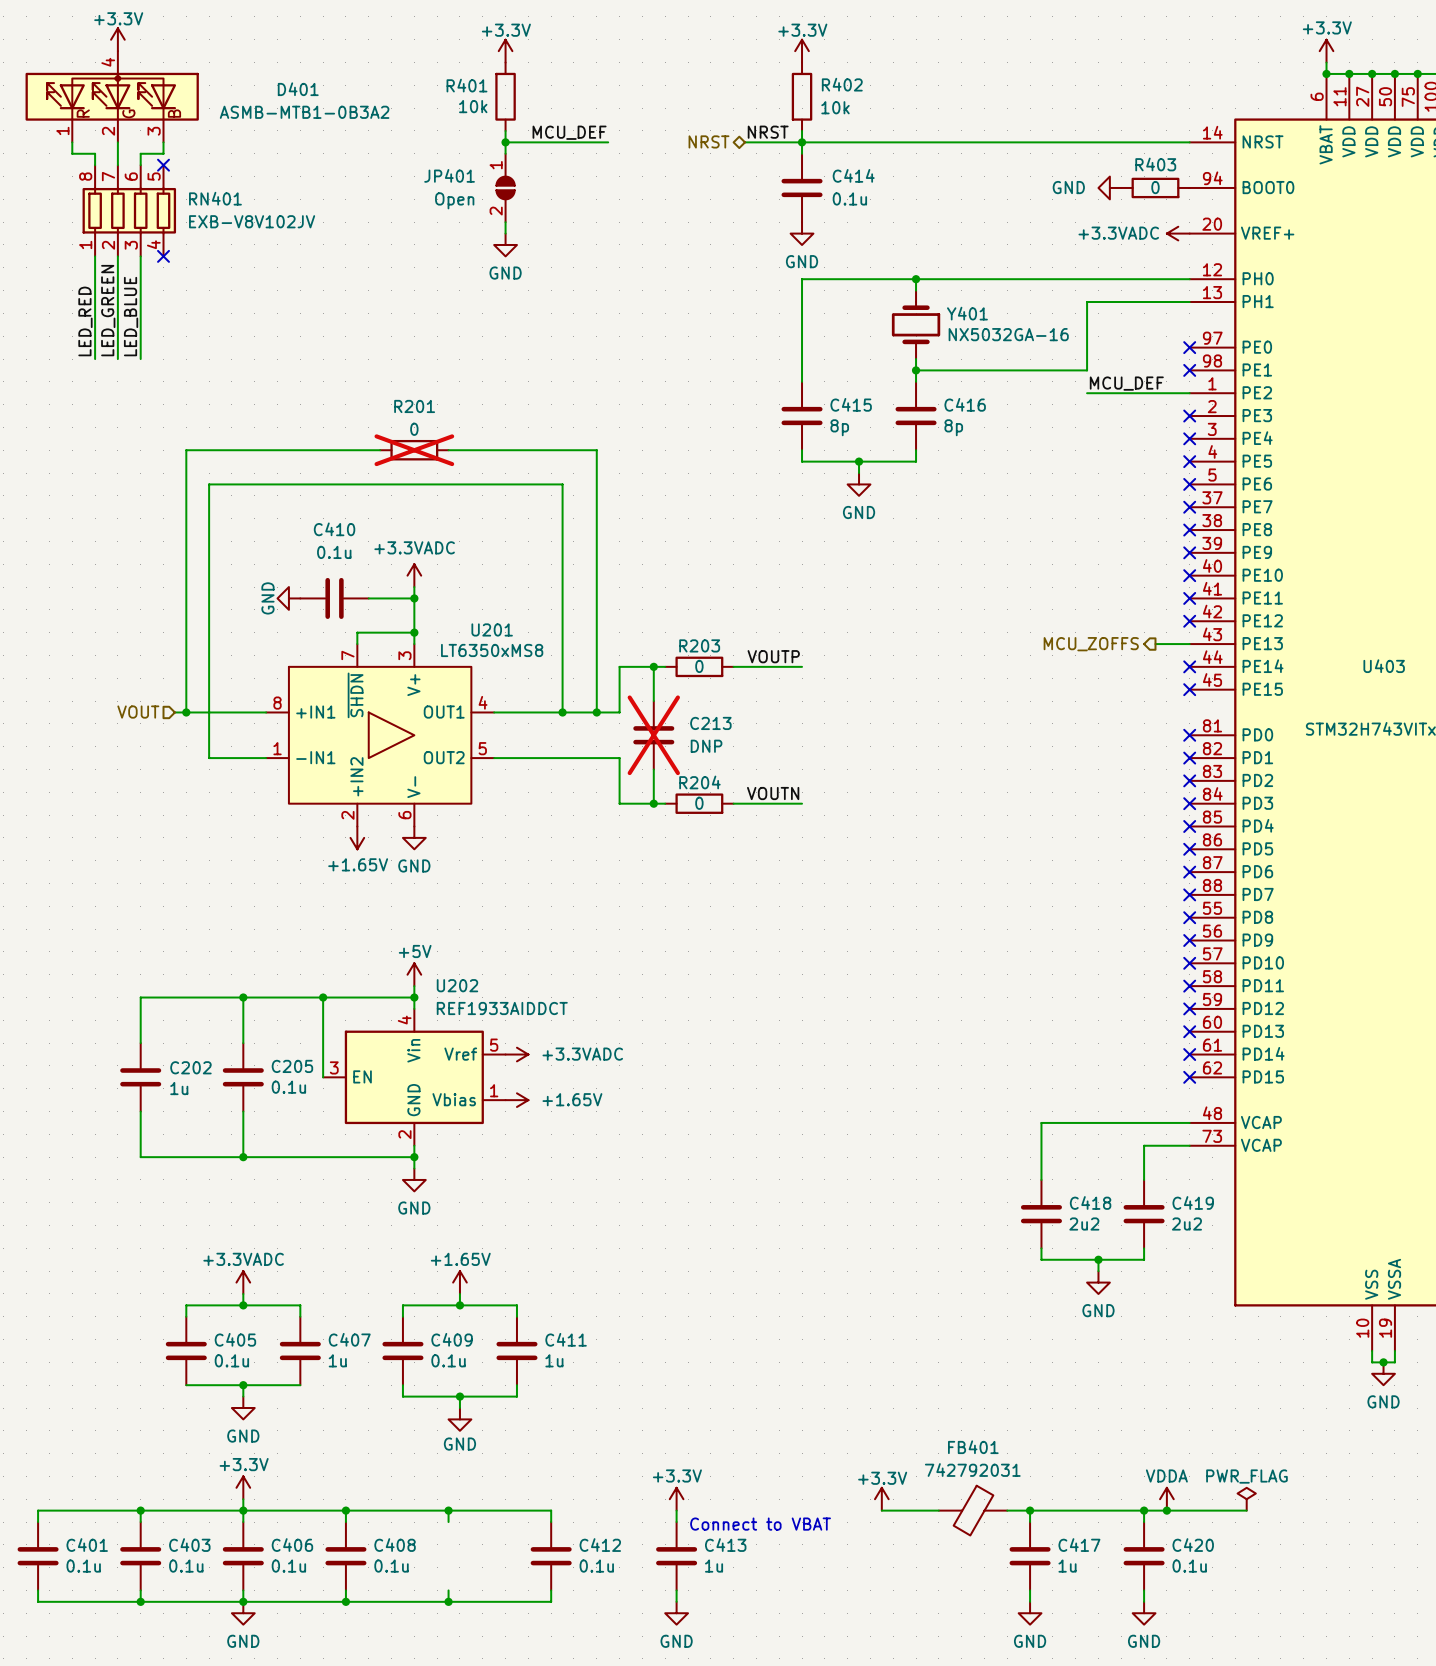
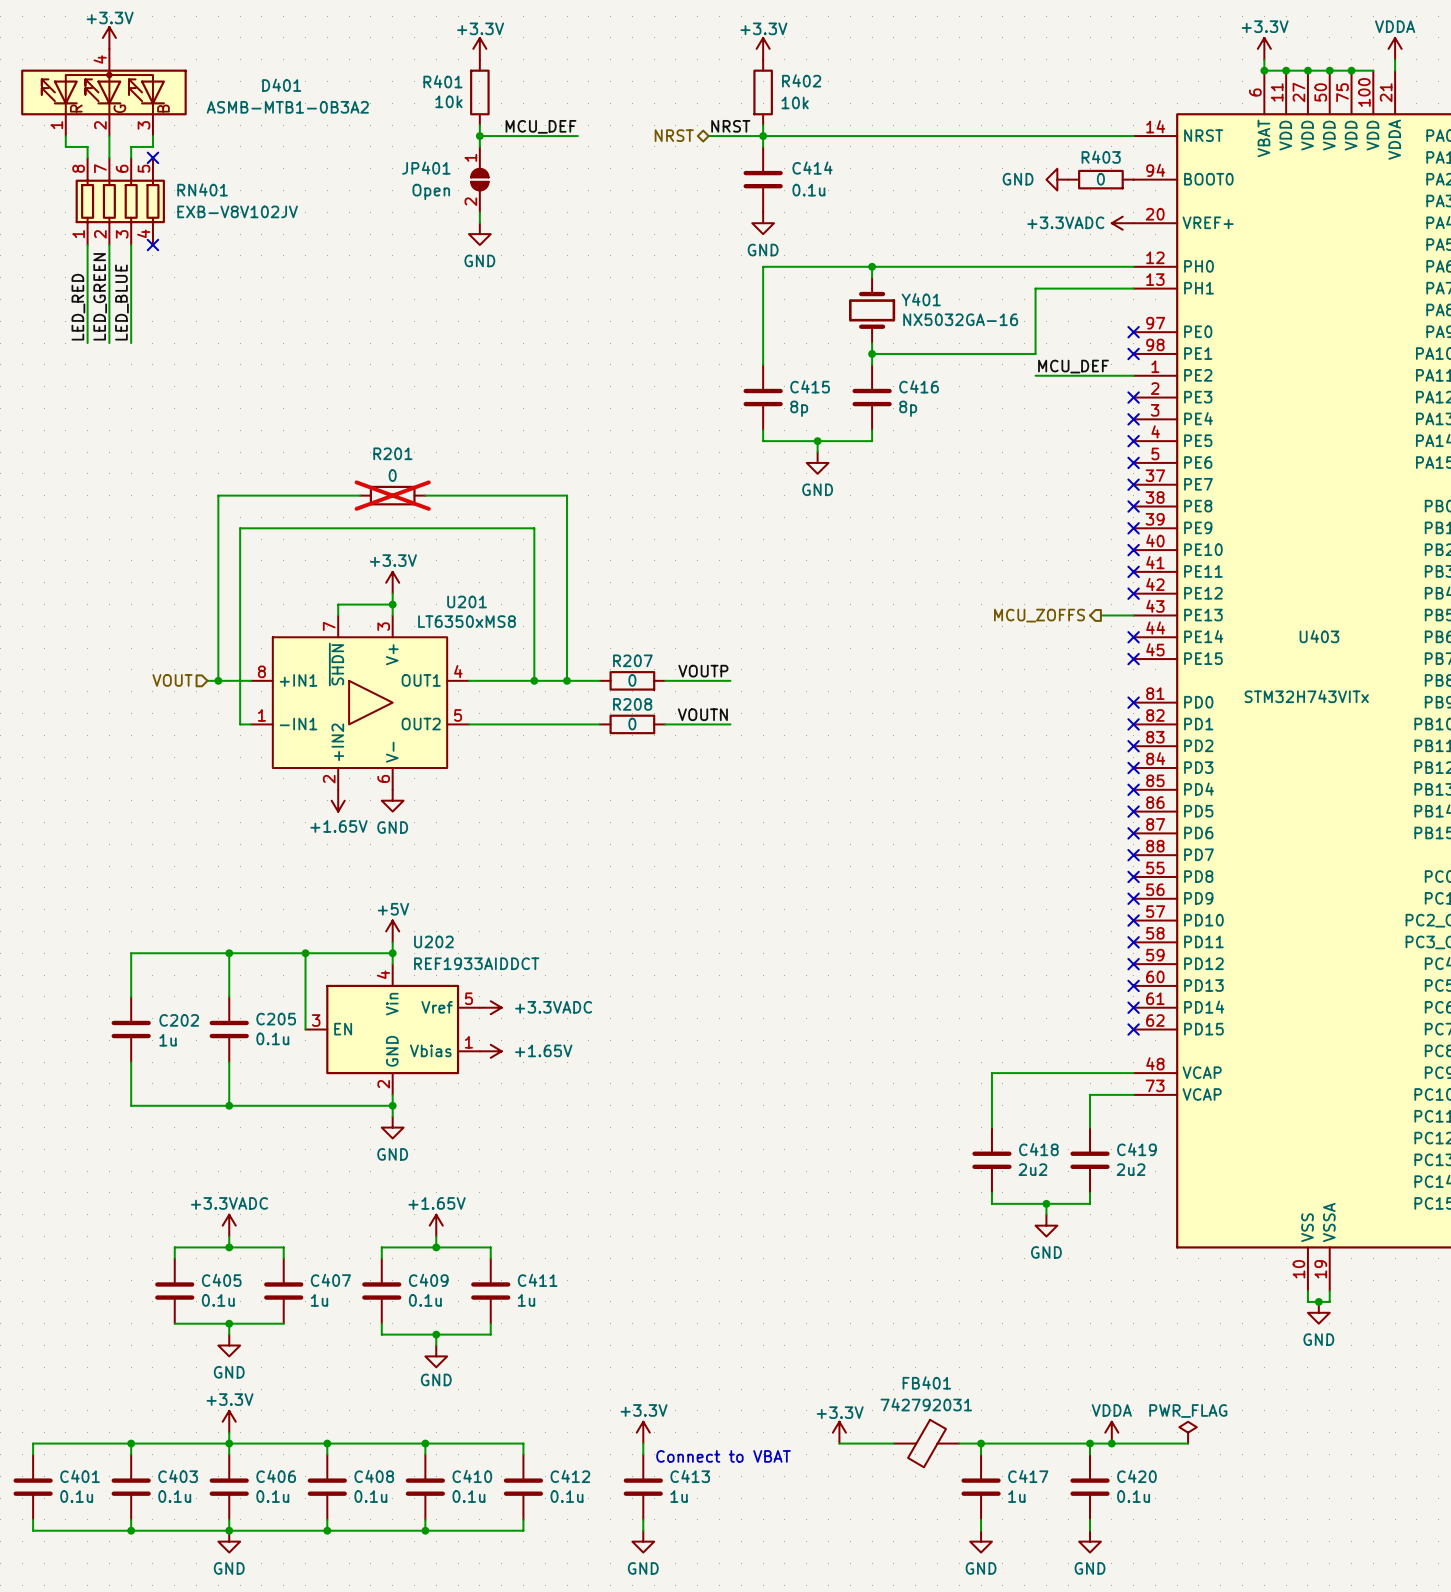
wire: (380, 450) (186, 450) (186, 712) -> none
R201 position: (414, 450) -> (392, 495)
wire: (448, 450) (596, 450) (596, 518) -> (425, 495) (567, 495)
wire: none -> (359, 495) (218, 495) (218, 680)
C410 name position: C410 (334, 529) -> C410 (472, 1476)
wire: (562, 552) (562, 484) (209, 484) (209, 758) (254, 758) -> (534, 528) (240, 528) (240, 724)
power symbol: +3.3VADC (414, 575) -> none
power symbol: GND (288, 598) -> none
C410 rotation: 0° (334, 598) -> 90° clockwise (425, 1487)
C410 position: (334, 598) -> (425, 1487)
wire: (368, 598) (414, 598) -> none
junction: (414, 598) -> none
power symbol: none -> +3.3V (392, 582)
label position: VOUTP (773, 656) -> VOUTP (703, 671)
wire: (653, 666) (653, 701) -> none
junction: (653, 666) -> none
wire: (665, 666) (619, 666) (619, 712) -> (599, 680) (588, 680)
R203: 0 (699, 666) -> none
wire: (733, 666) (802, 666) -> (665, 680) (730, 680)
hierarchical label position: VOUT (138, 712) -> VOUT (172, 680)
wire: (174, 712) (220, 712) -> none
junction position: (186, 712) -> (218, 680)
R207: none -> 0 (632, 680)
C213: DNP (653, 735) -> none
wire: (619, 758) (619, 803) (665, 803) -> (588, 724) (599, 724)
R208: none -> 0 (632, 724)
wire: (653, 769) (653, 803) -> none
label position: VOUTN (773, 793) -> VOUTN (702, 714)
junction: (653, 803) -> none
R204: 0 (699, 803) -> none
wire: (733, 803) (802, 803) -> (665, 724) (730, 724)

